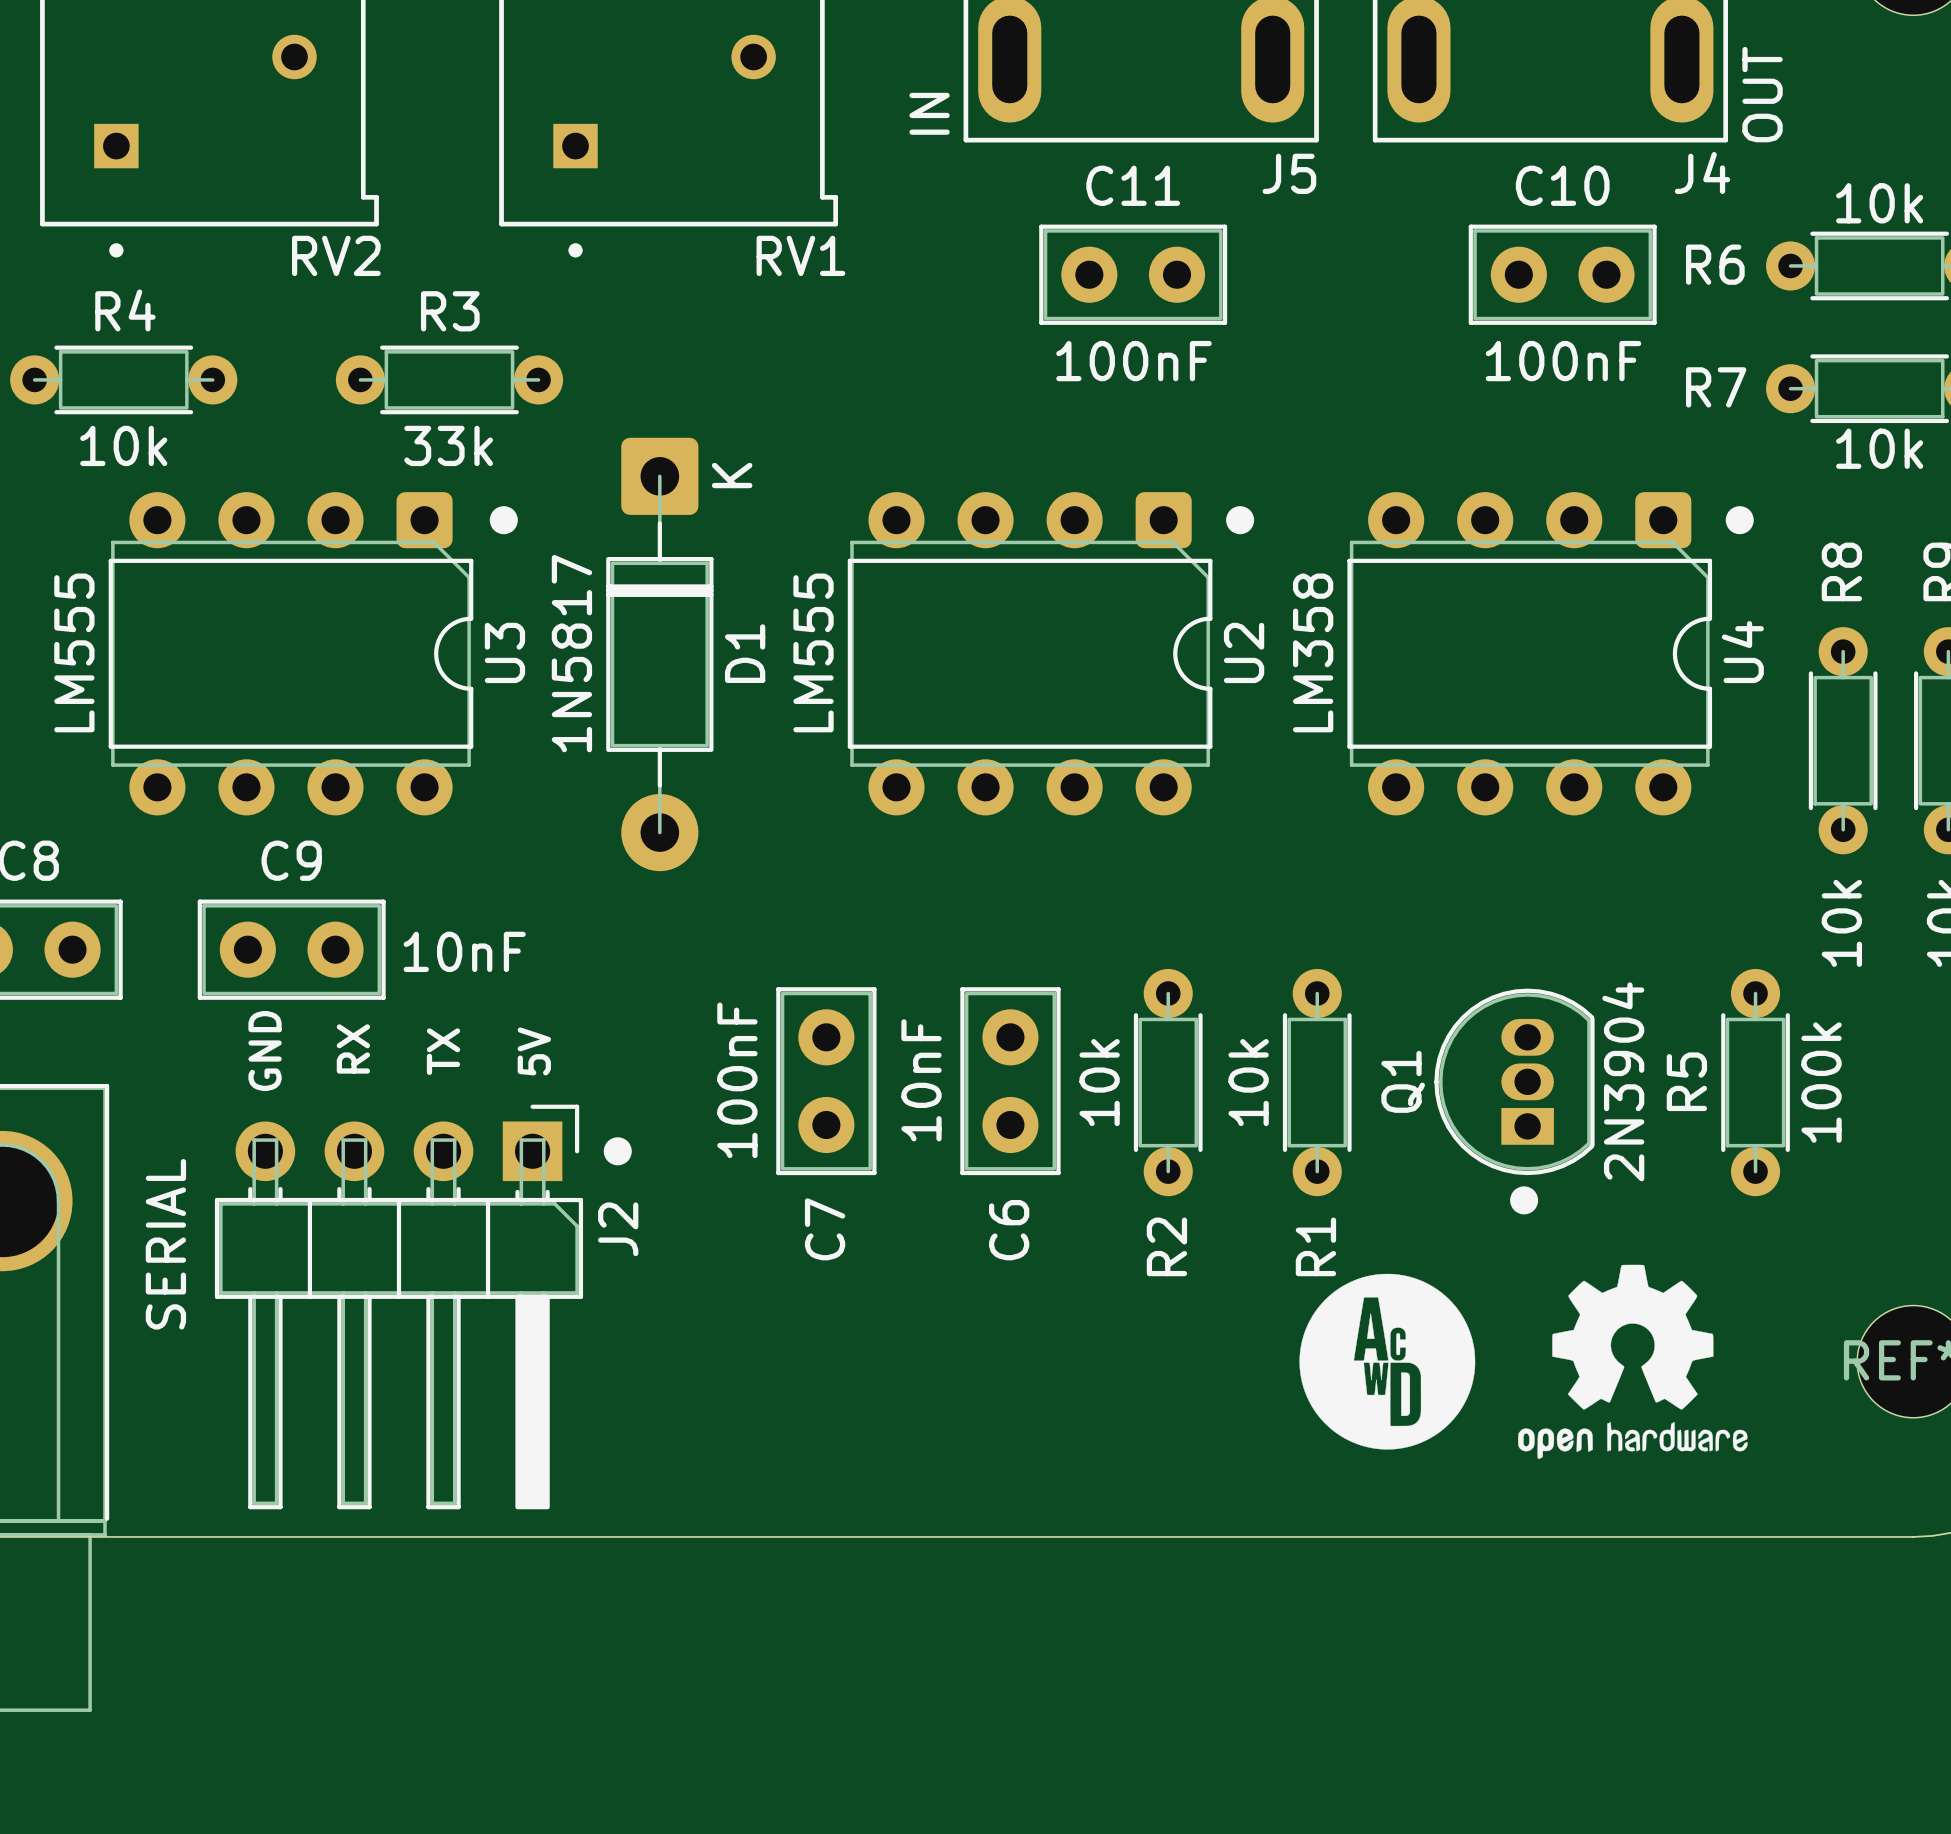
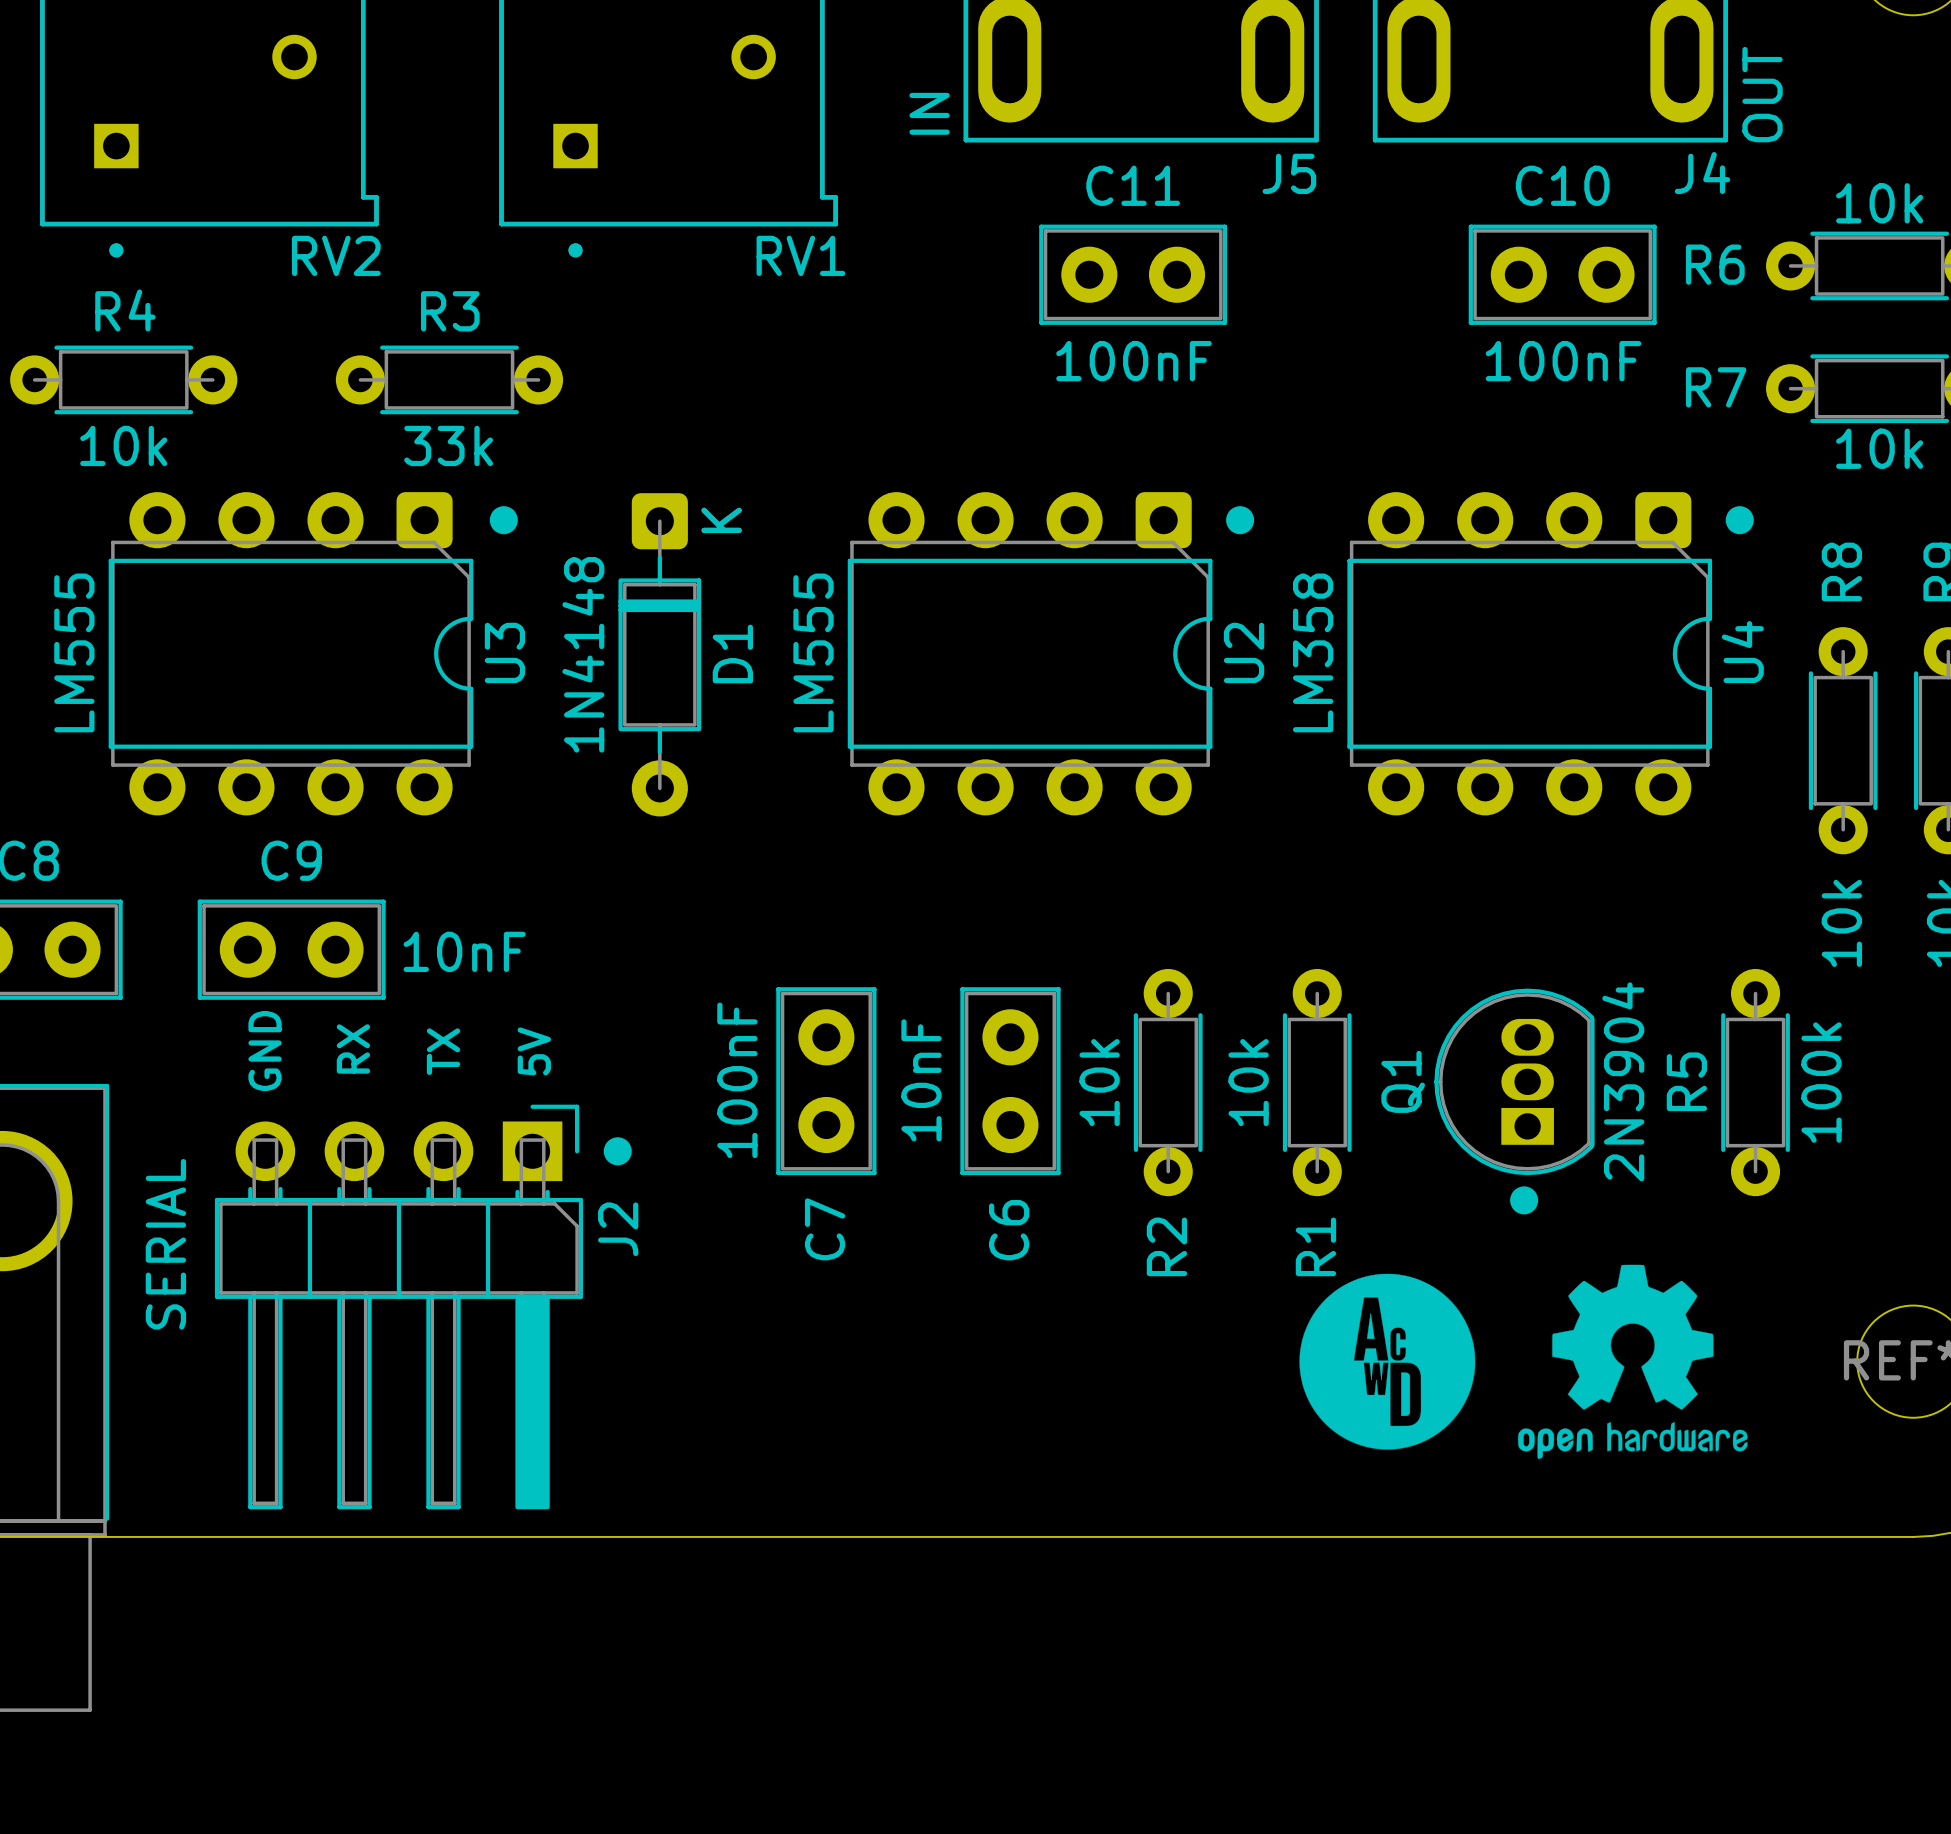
D1 footprint: [606, 437, 714, 872] -> [618, 493, 702, 817]
D1 value: 1N5817 (571, 653) -> 1N4148 (583, 654)

